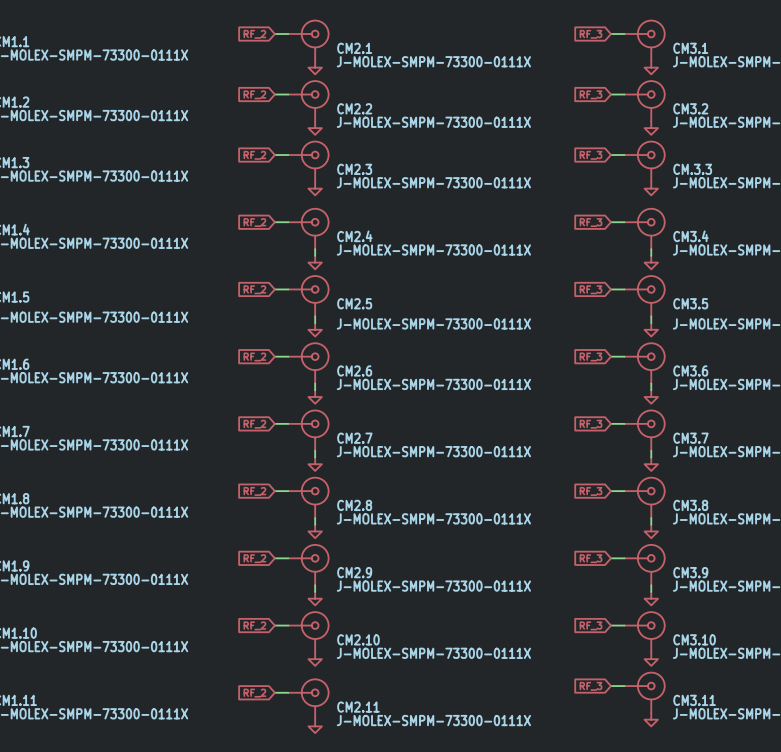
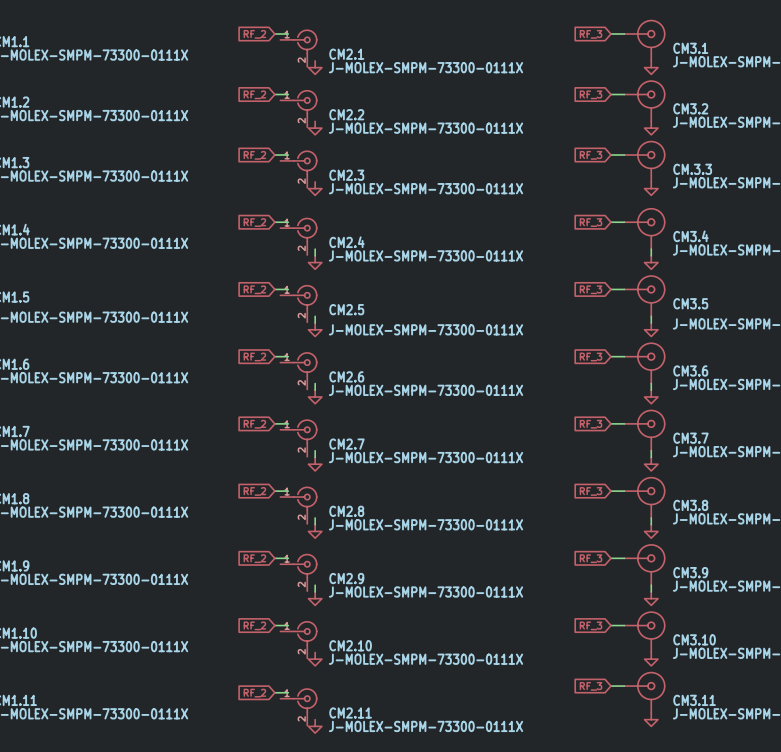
CM2.1 symbol: [288, 19, 330, 61] -> [280, 29, 318, 67]
CM2.2 symbol: [288, 80, 330, 122] -> [280, 90, 318, 128]
CM2.3 symbol: [288, 140, 330, 182] -> [280, 150, 318, 188]
CM2.4 symbol: [288, 208, 330, 250] -> [280, 217, 318, 256]
CM2.5 symbol: [288, 275, 330, 317] -> [280, 285, 318, 323]
CM2.6 symbol: [288, 342, 330, 384] -> [280, 352, 318, 390]
CM2.7 symbol: [288, 409, 330, 451] -> [280, 419, 318, 457]
CM2.8 symbol: [288, 477, 330, 519] -> [280, 486, 318, 524]
CM2.9 symbol: [288, 544, 330, 586] -> [280, 553, 318, 592]
CM2.10 symbol: [288, 611, 330, 653] -> [280, 621, 318, 659]
CM2.11 symbol: [288, 678, 330, 720] -> [280, 688, 318, 726]

